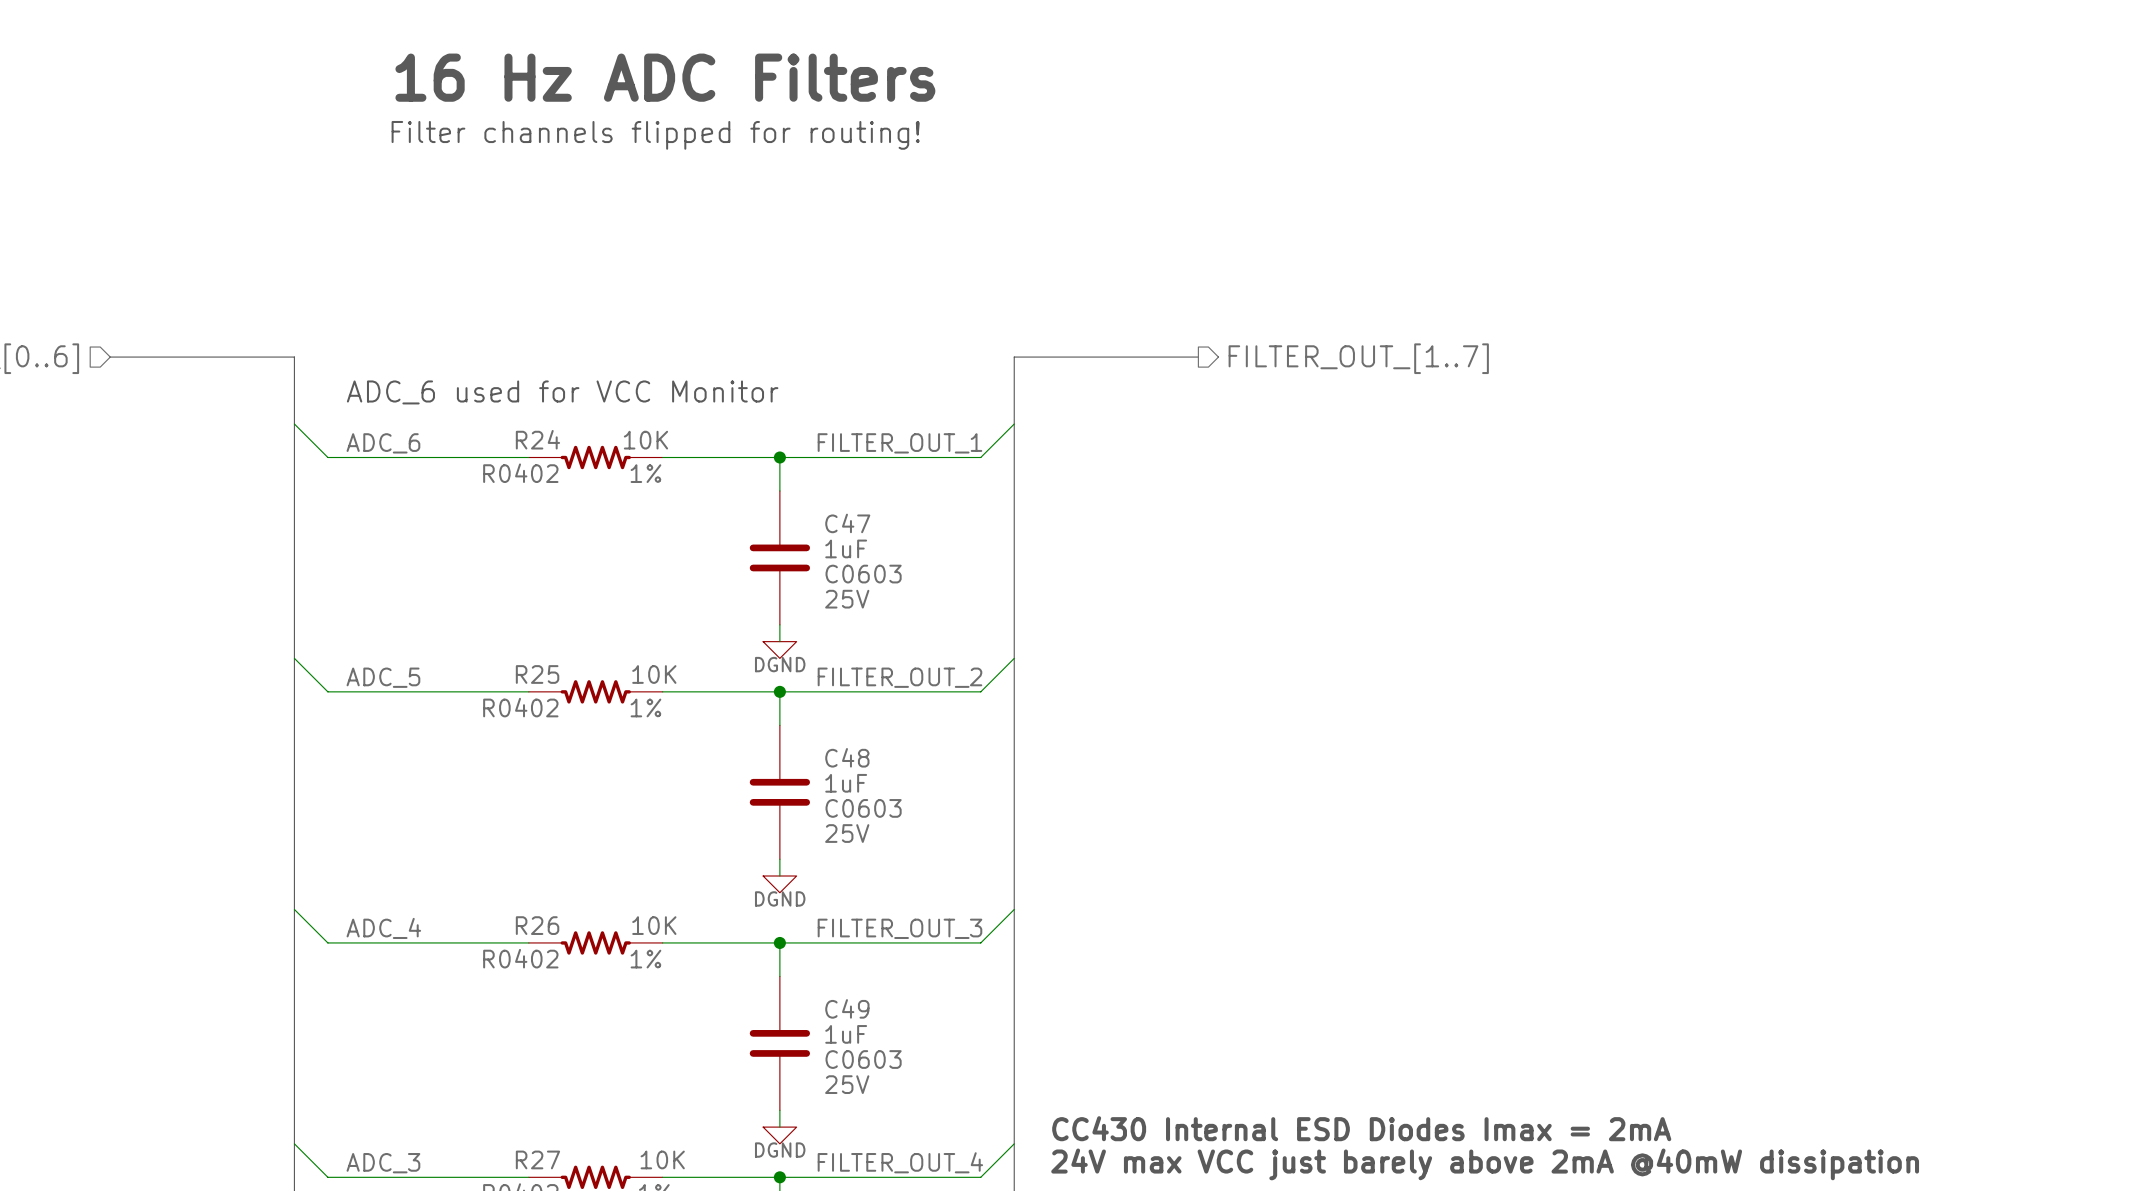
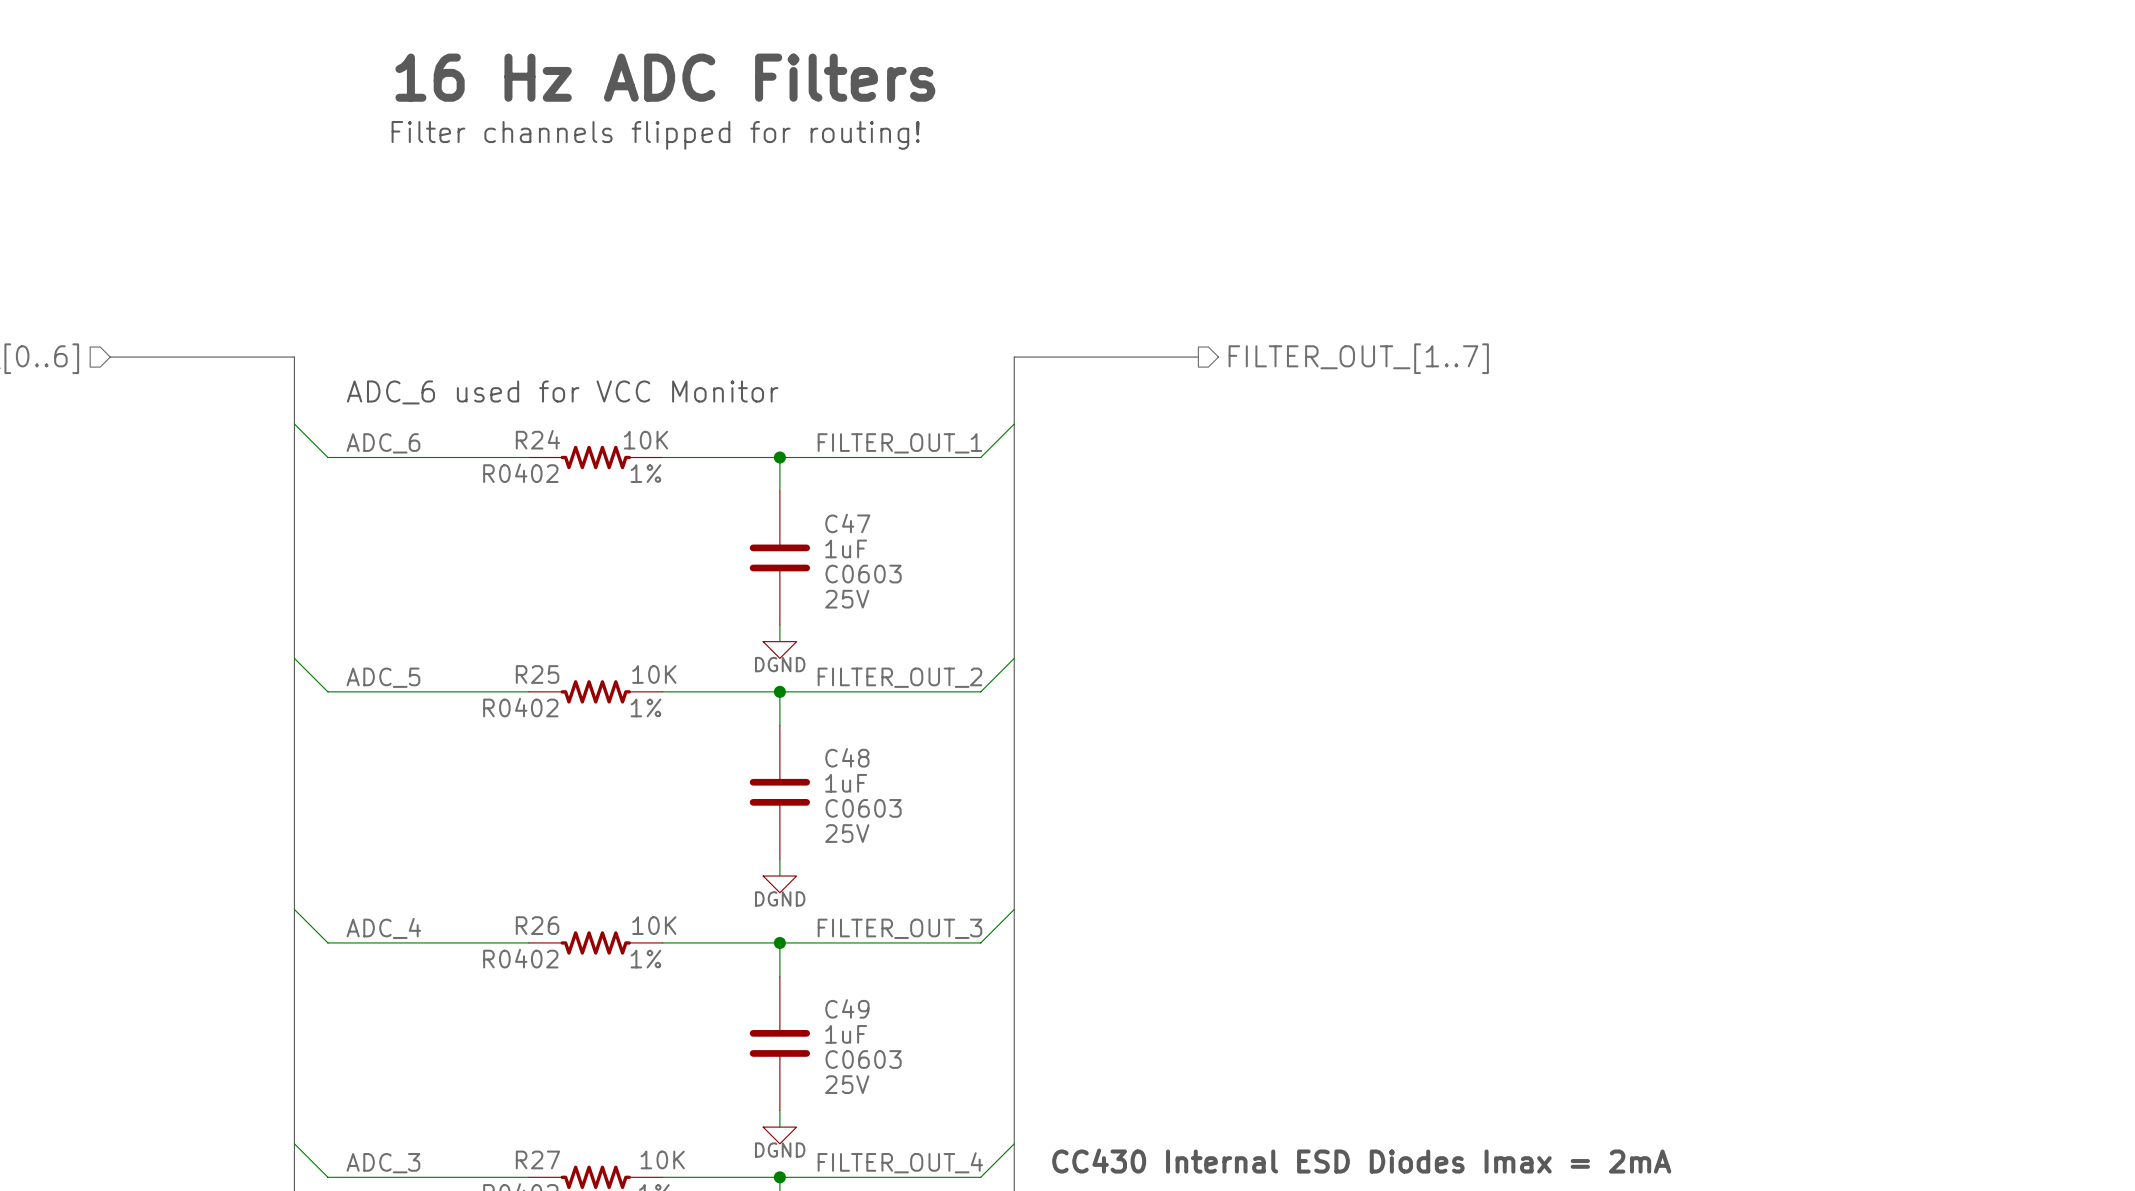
text: CC430 Internal ESD Diodes Imax = 2mA (1361, 1128) -> none
text: 24V max VCC just barely above 2mA @40mW dissipation (1485, 1164) -> CC430 Internal ESD Diodes Imax = 2mA (1361, 1161)

